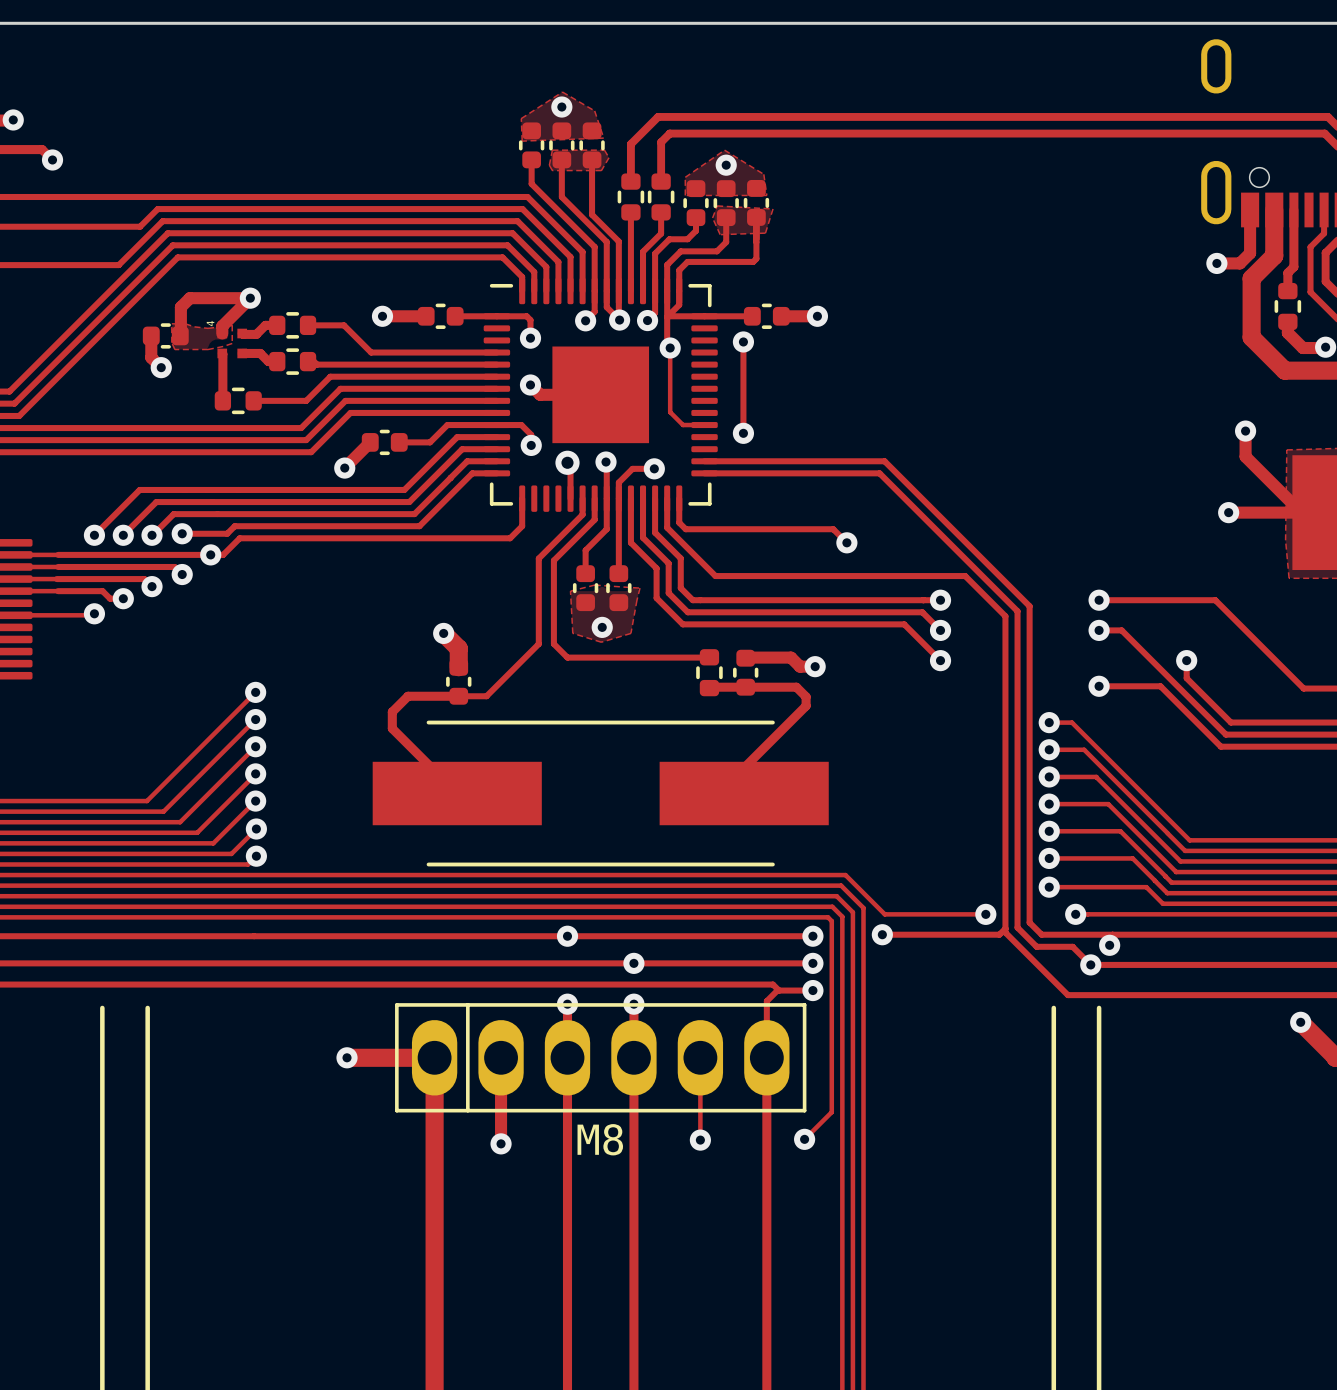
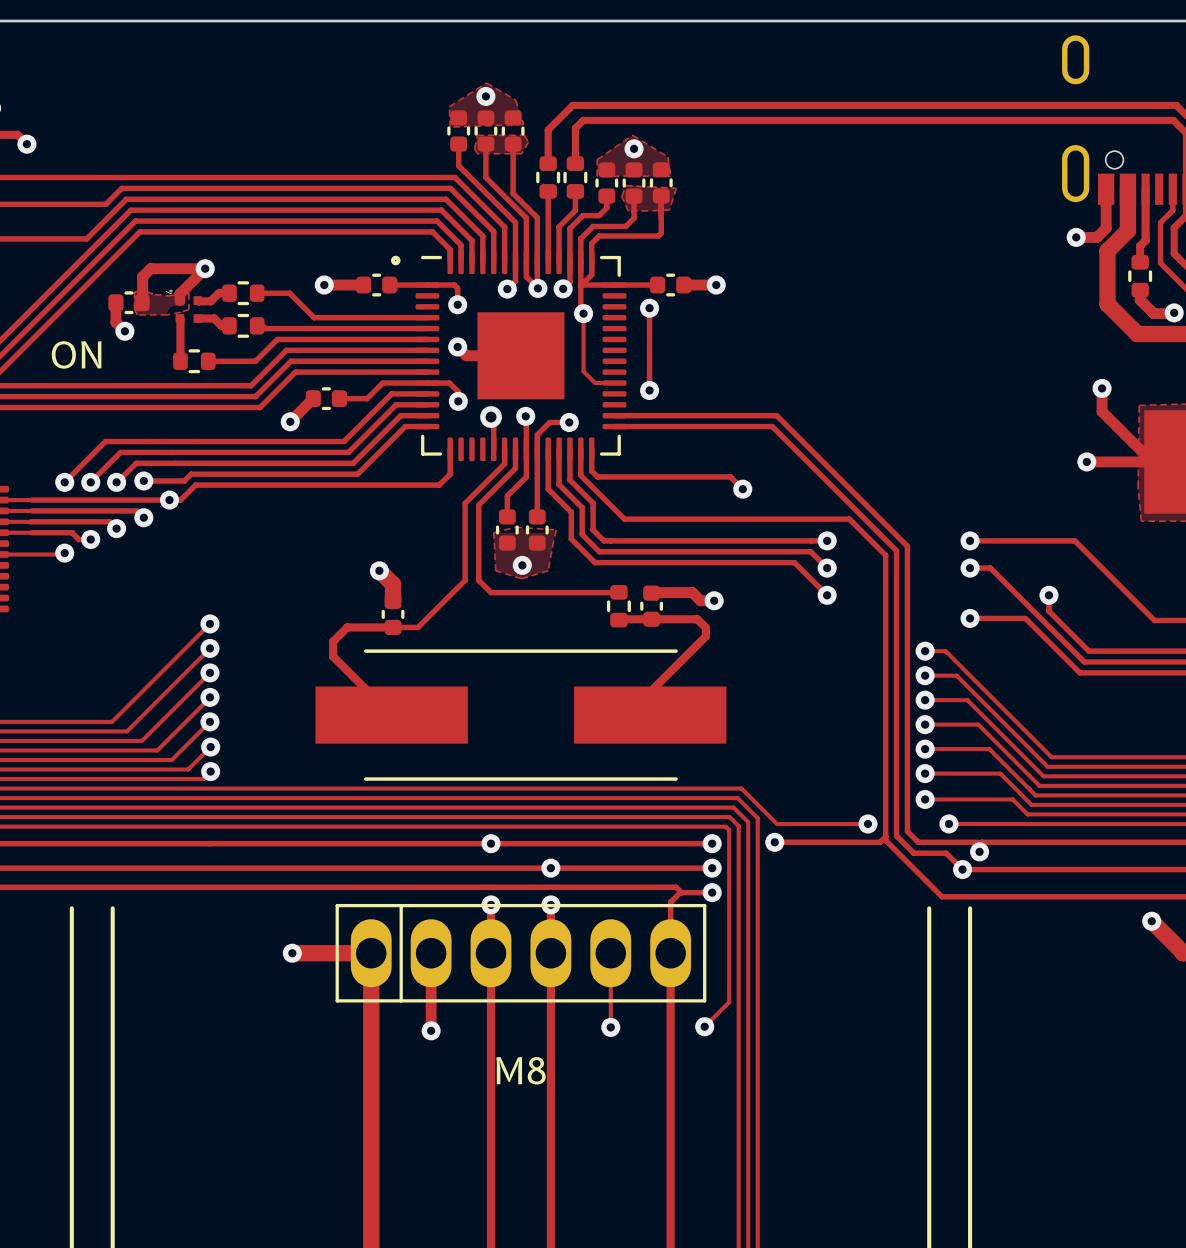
drawing: none -> [390, 255, 401, 266]
text: none -> ON (76, 354)
M8 name position: M8 (600, 1139) -> M8 (520, 1070)

